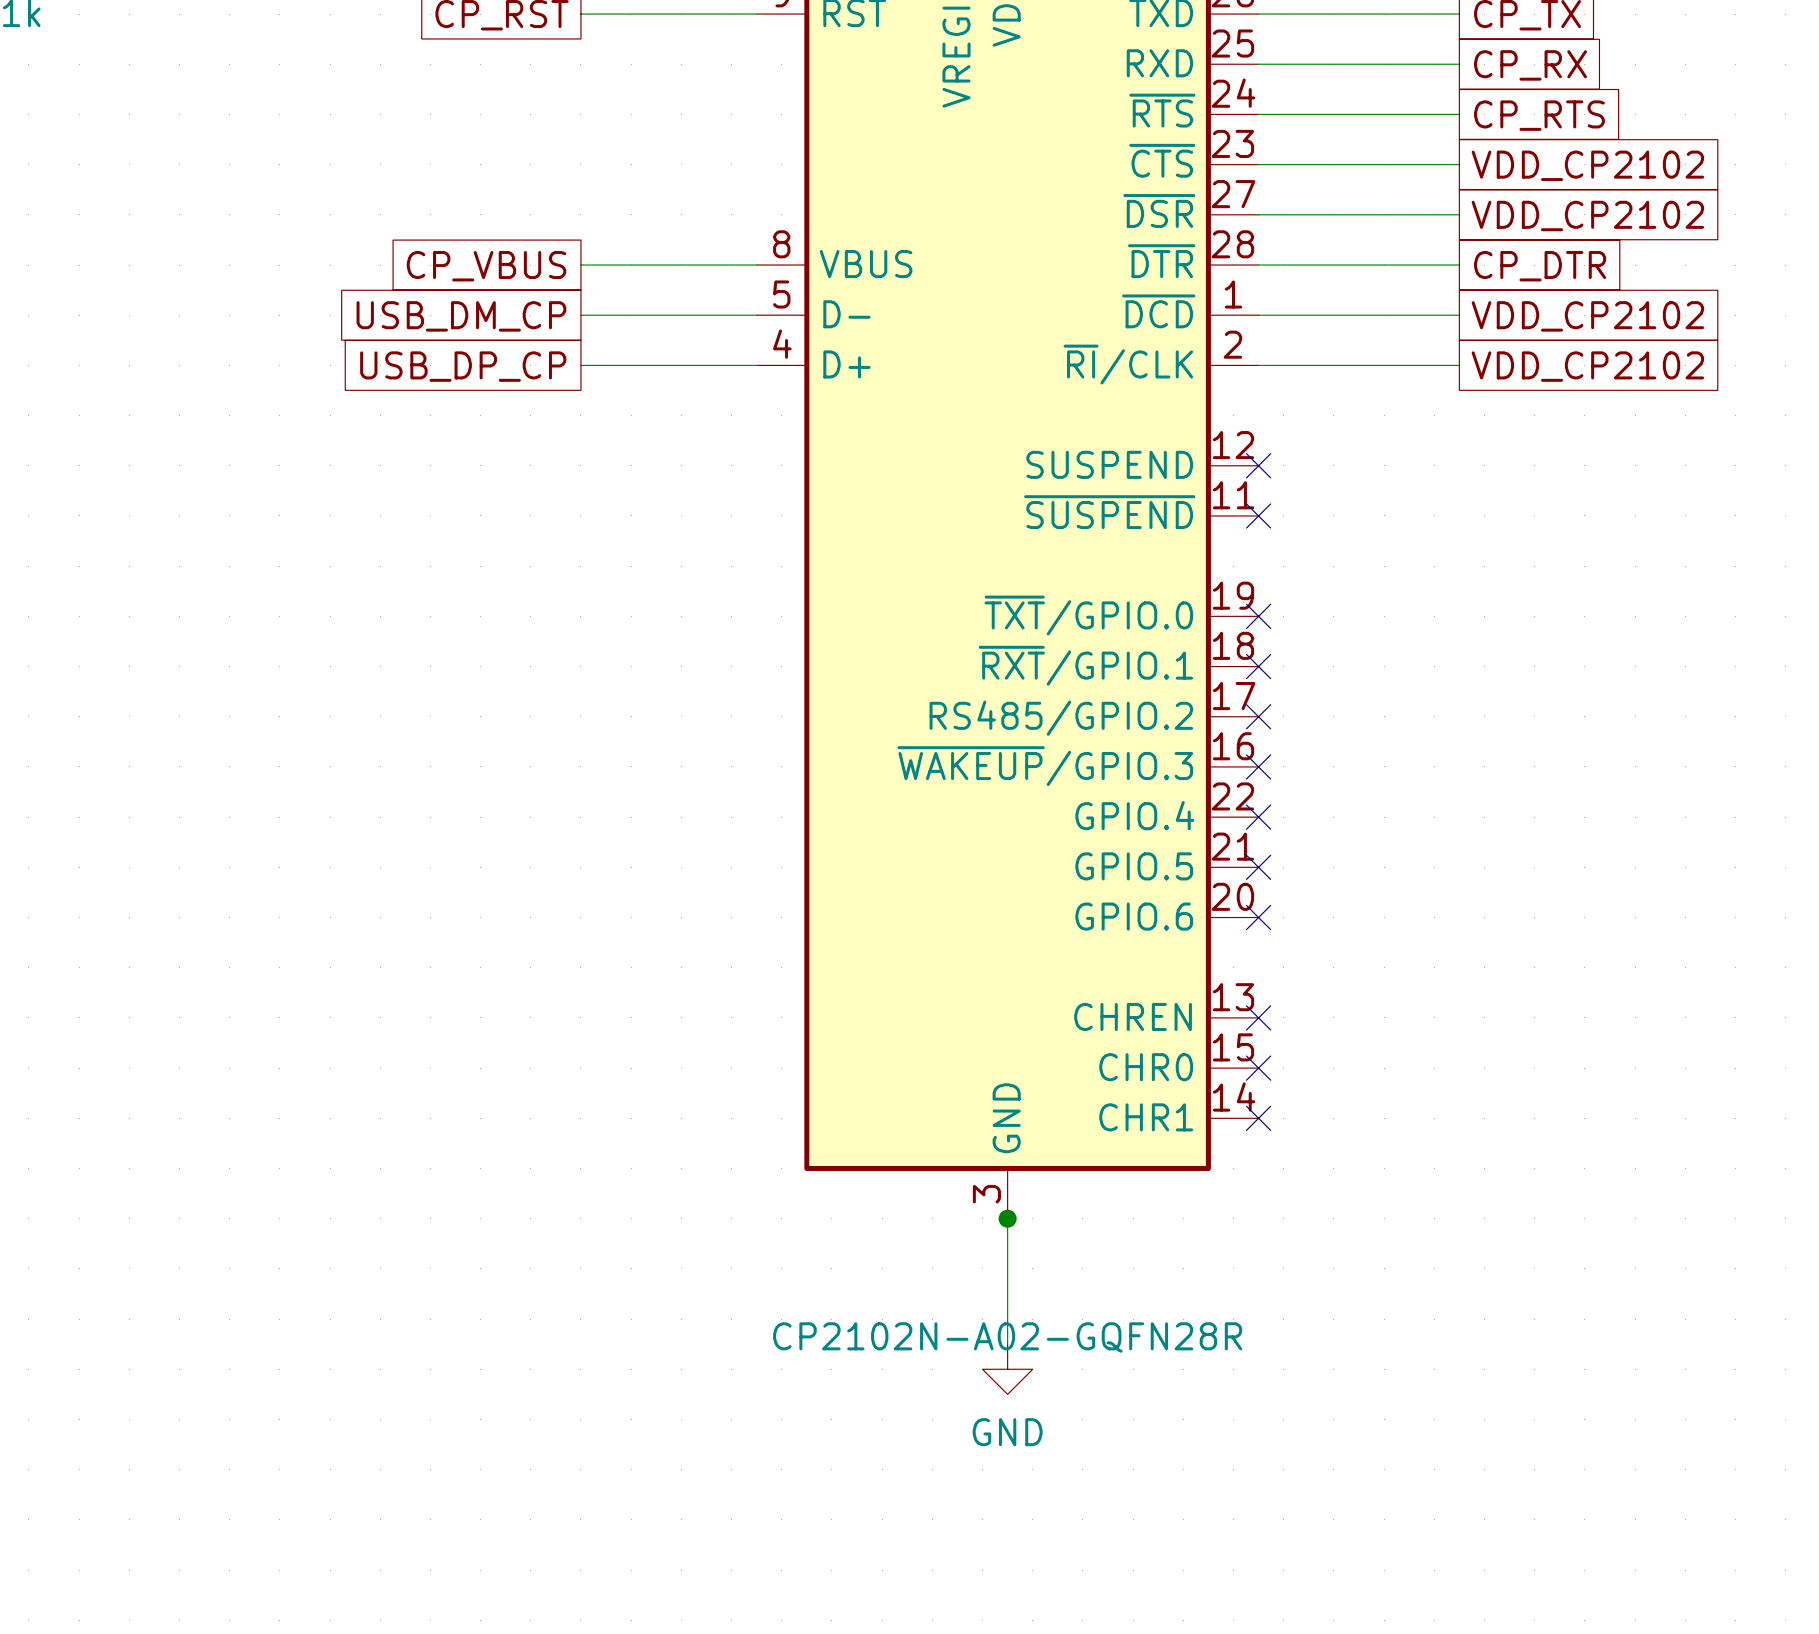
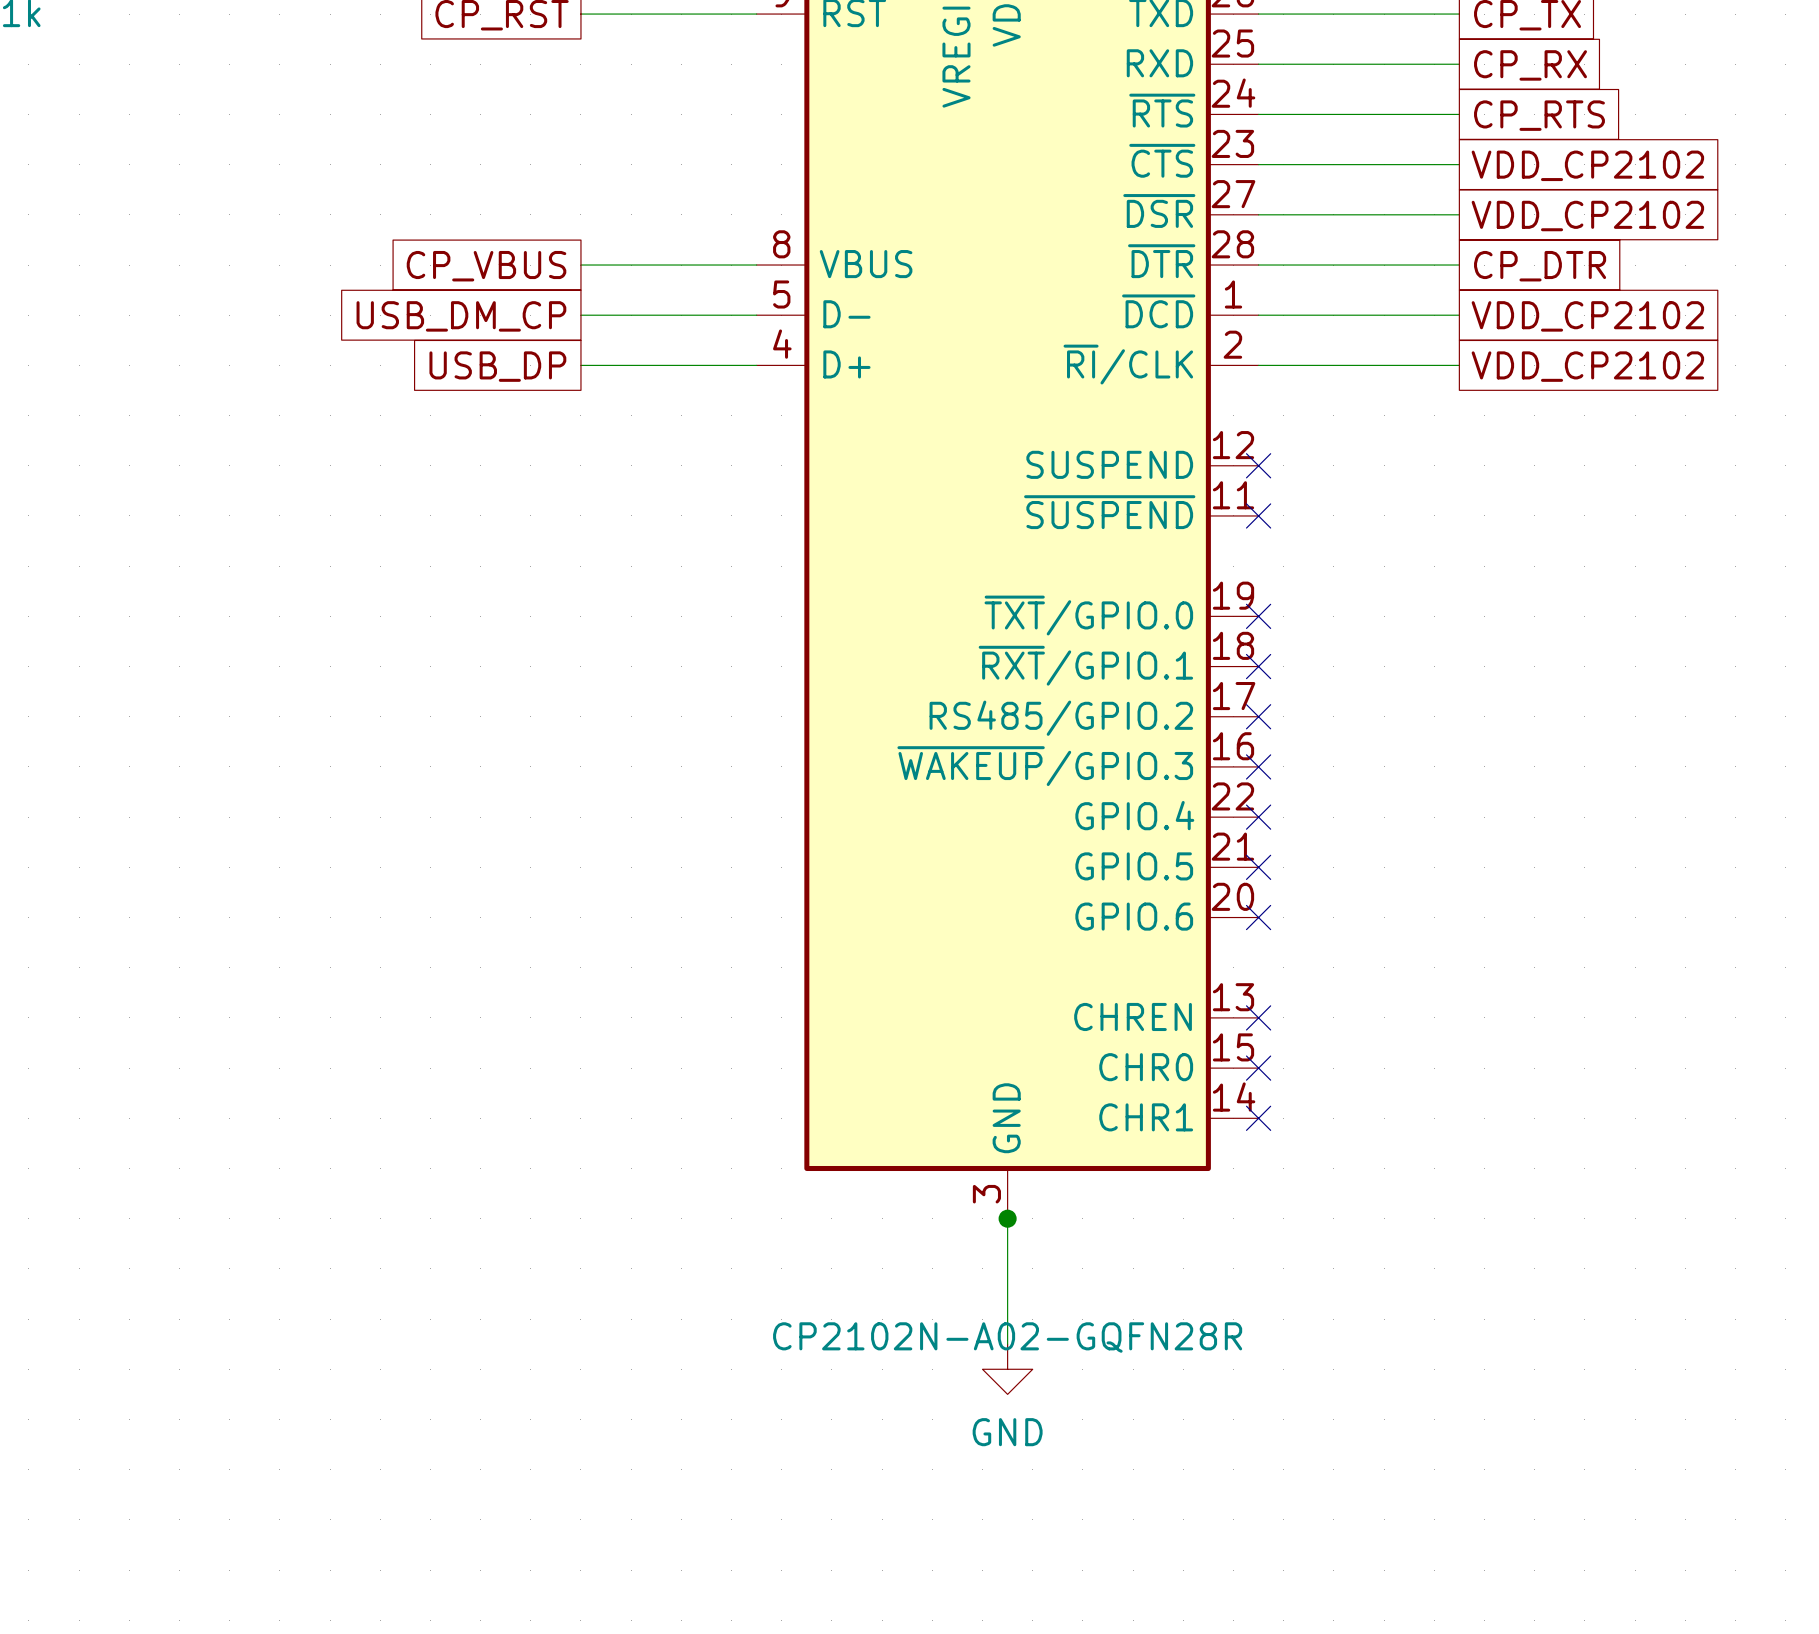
global label: USB_DP_CP (463, 366) -> USB_DP (497, 366)

